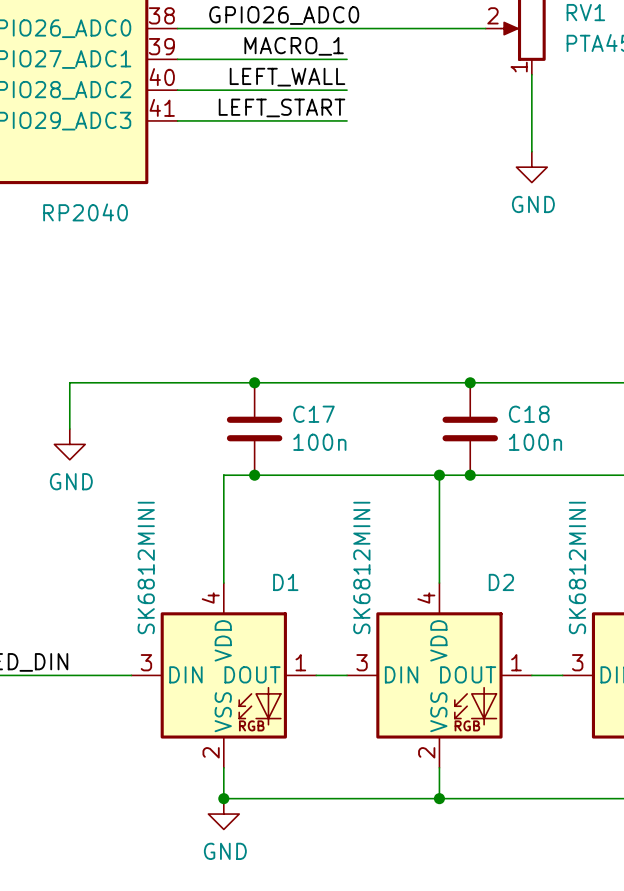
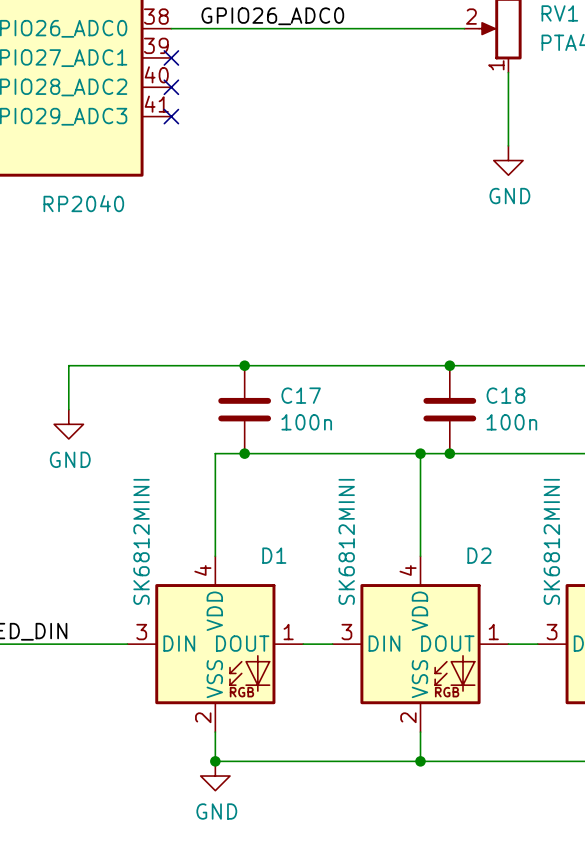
label: MACRO_1 (294, 46) -> none
wire: (177, 59) (347, 59) -> none
no-connect mark: none -> (171, 57)
label: LEFT_WALL (287, 77) -> none
wire: (177, 90) (347, 90) -> none
no-connect mark: none -> (171, 87)
label: LEFT_START (282, 107) -> none
wire: (177, 120) (347, 120) -> none
no-connect mark: none -> (171, 116)

